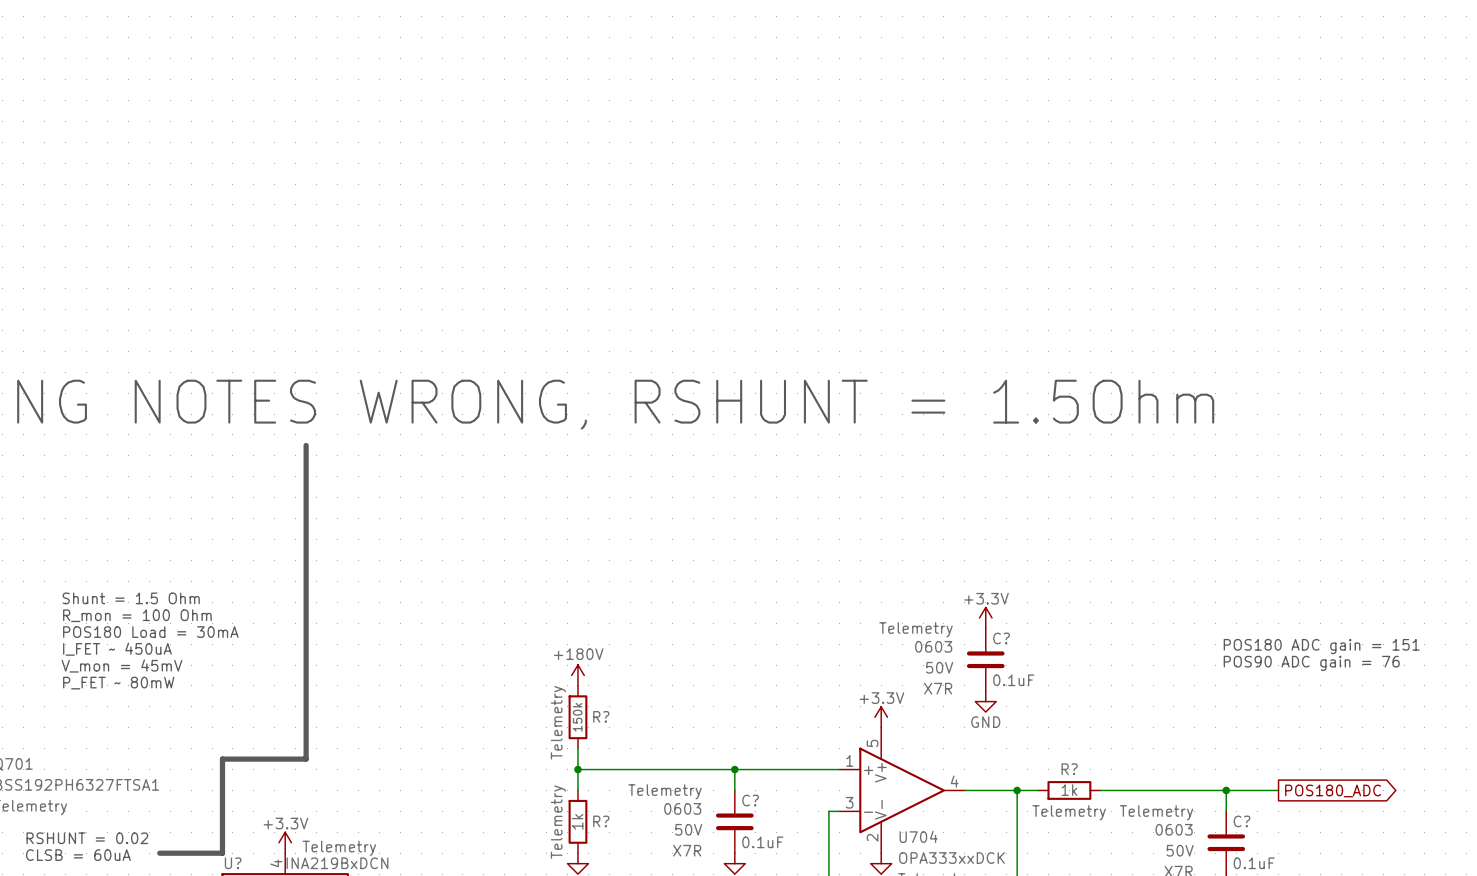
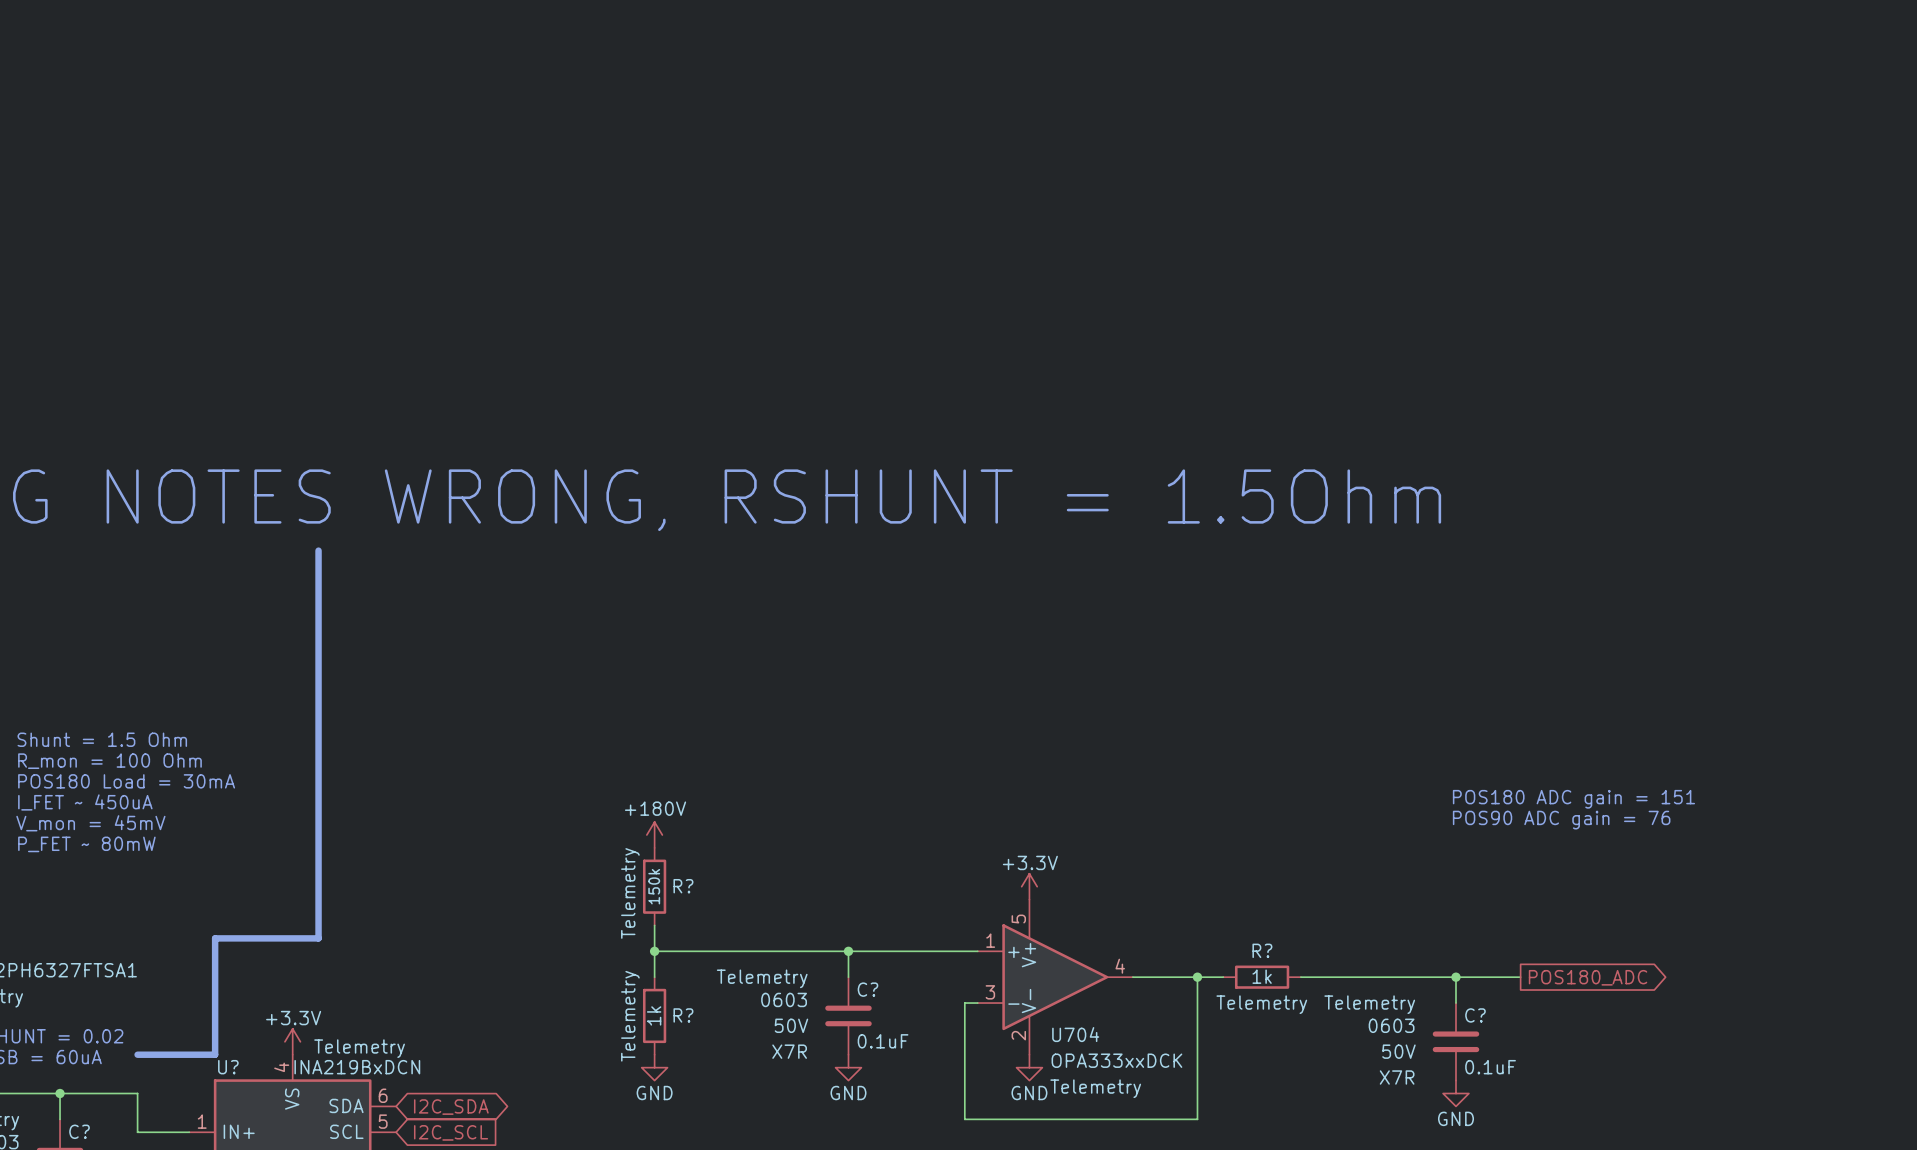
power symbol: +3.3V (985, 617) -> none
C?: 0.1uF (985, 659) -> none
power symbol: GND (985, 701) -> none

